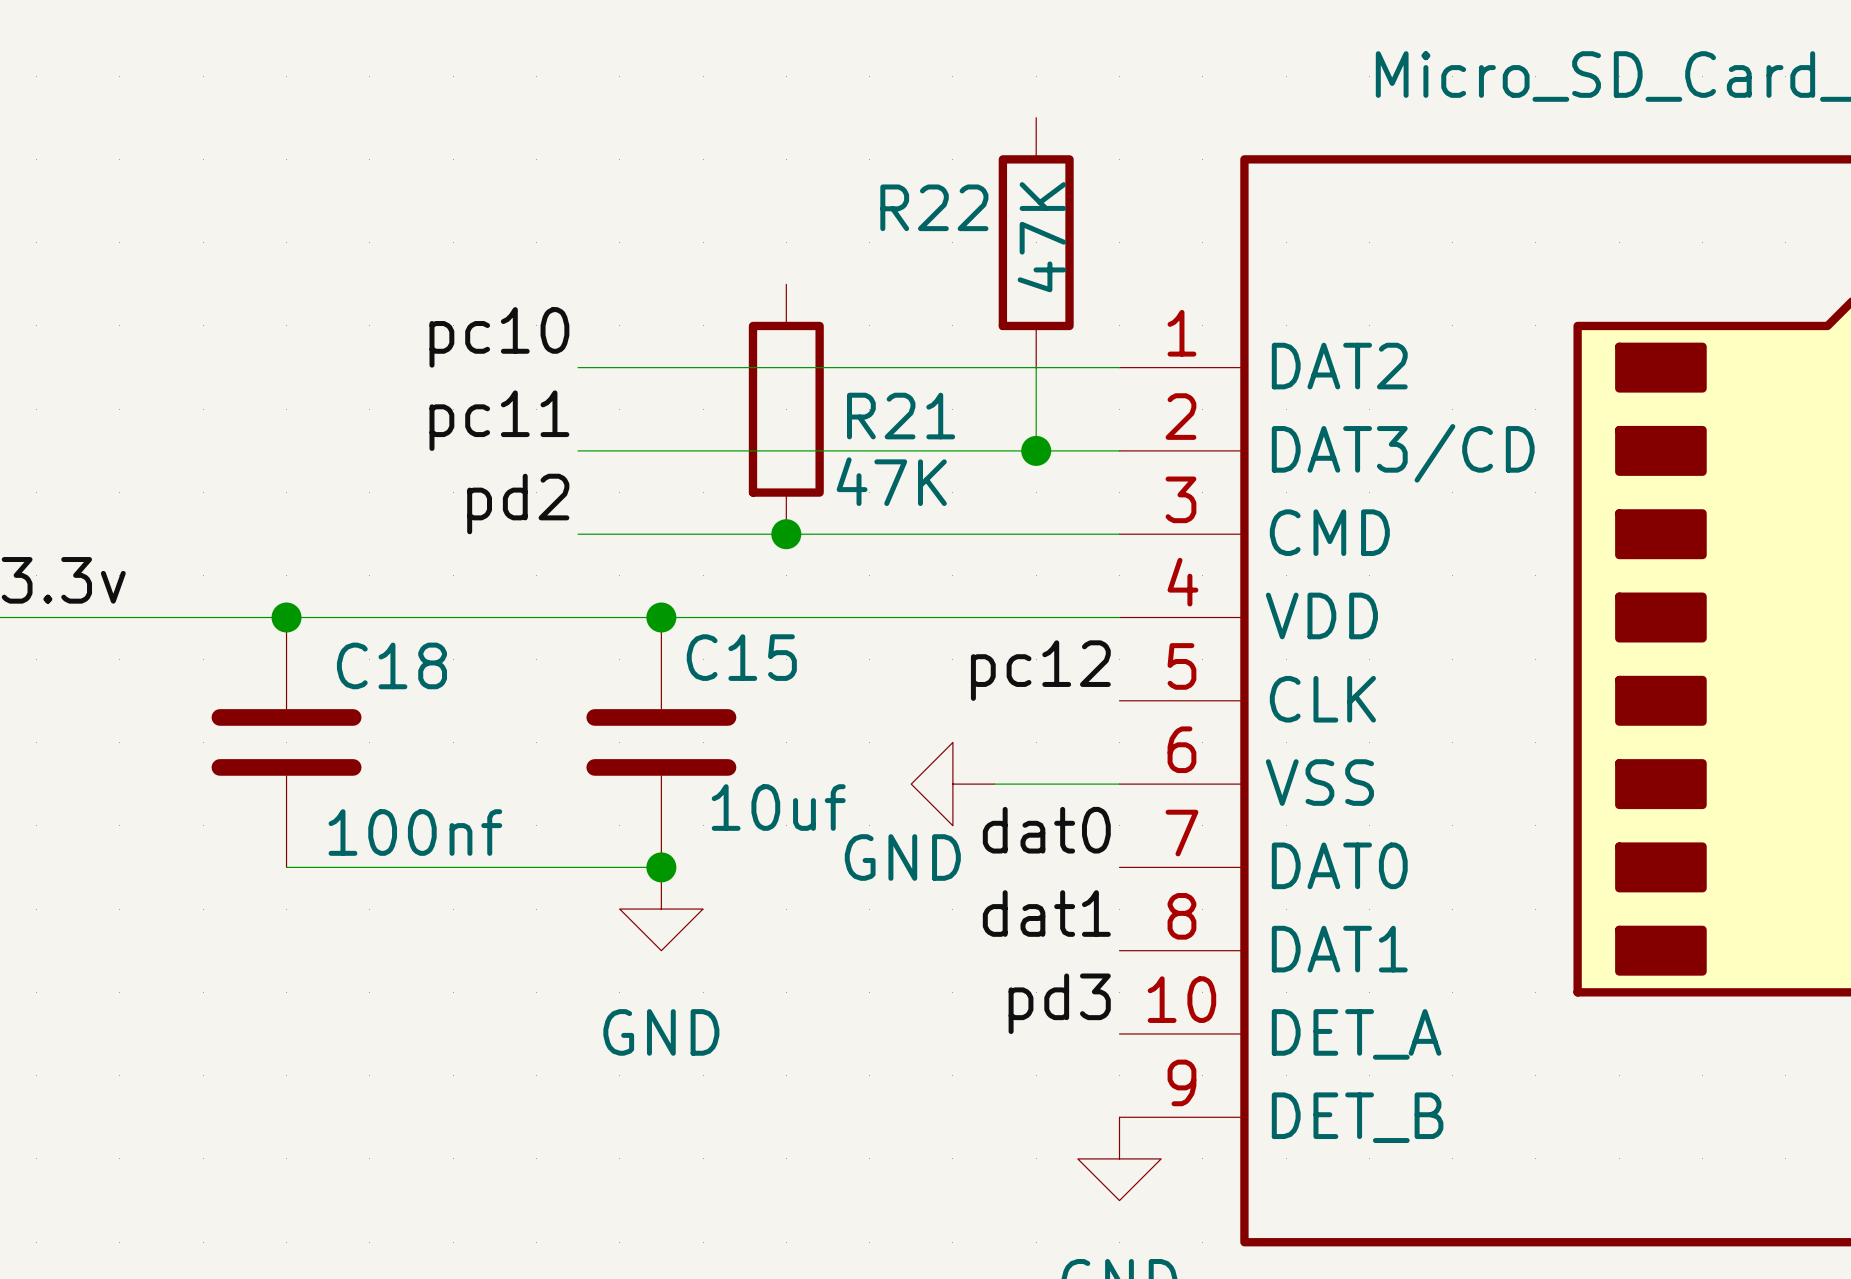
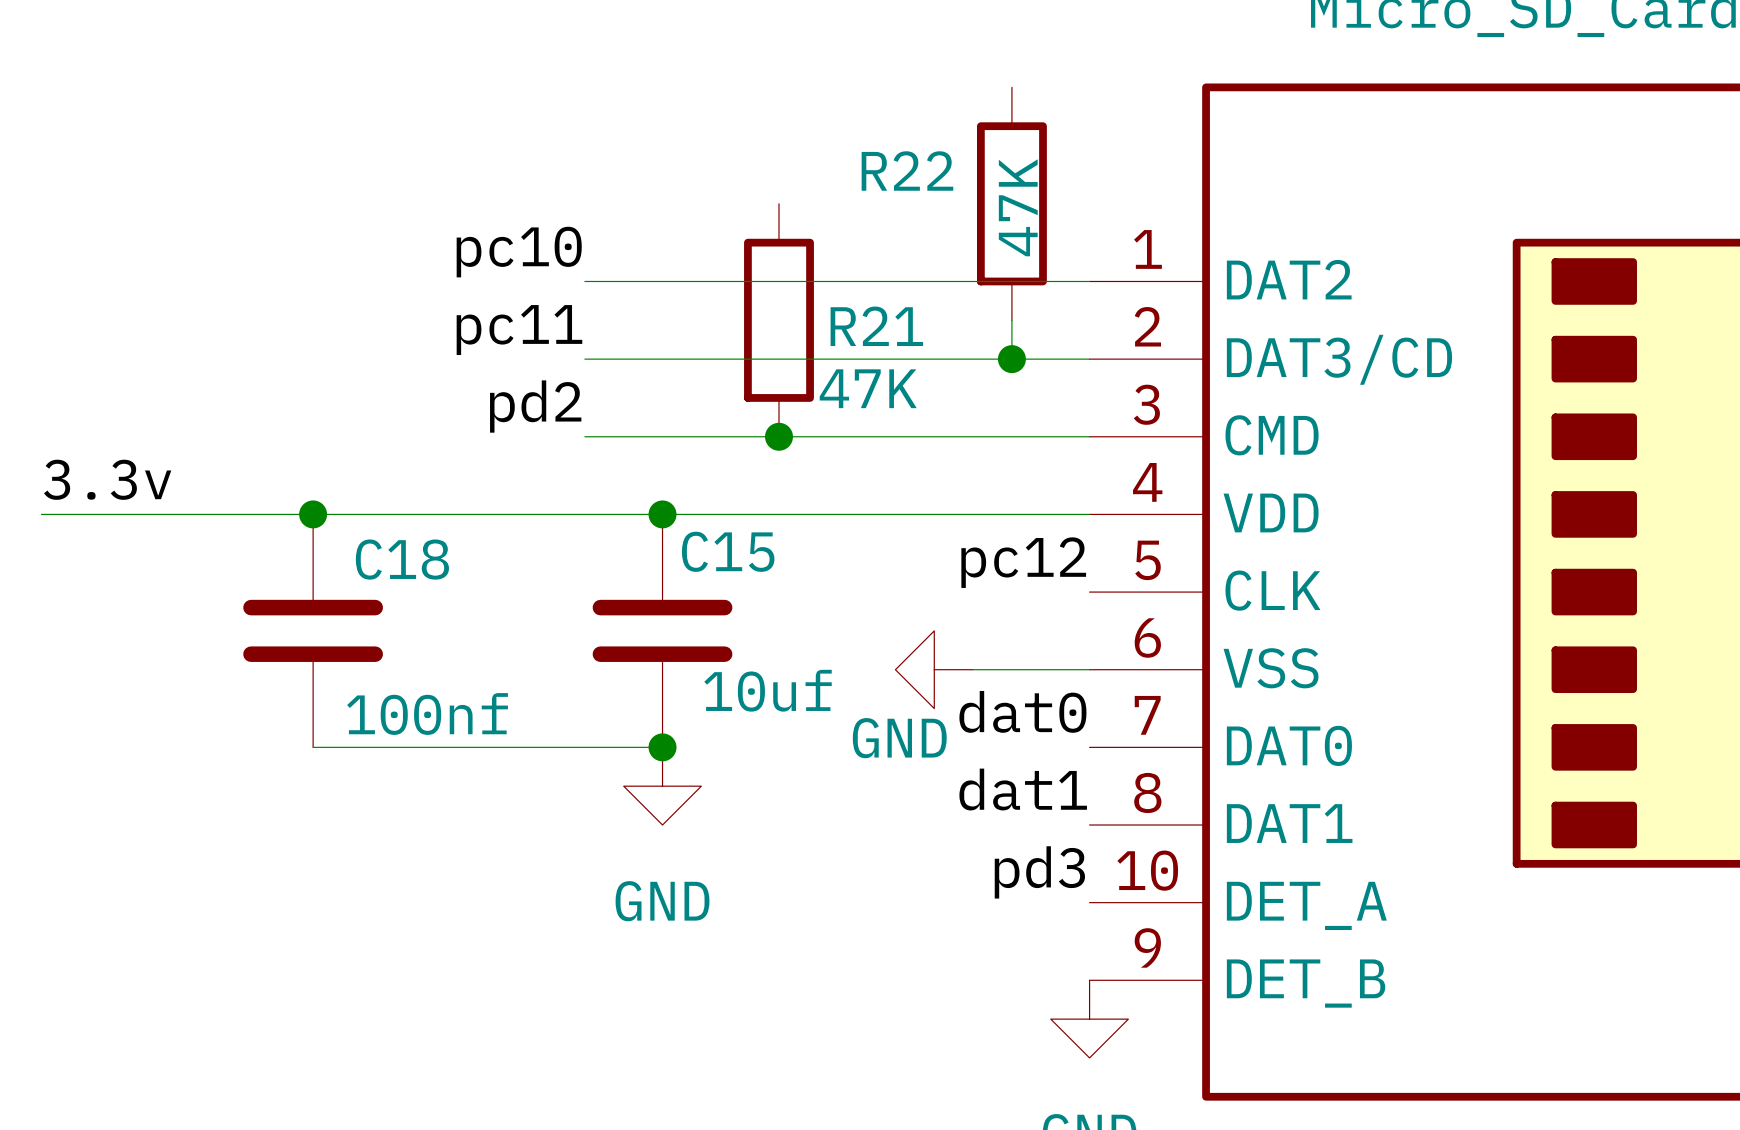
R22 position: (1036, 242) -> (1011, 203)

